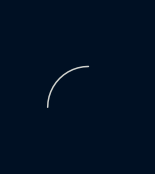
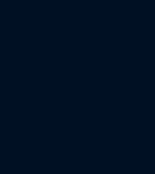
board edge: (88, 66) (72, 69) (59, 78) (50, 91) (47, 107) -> none

